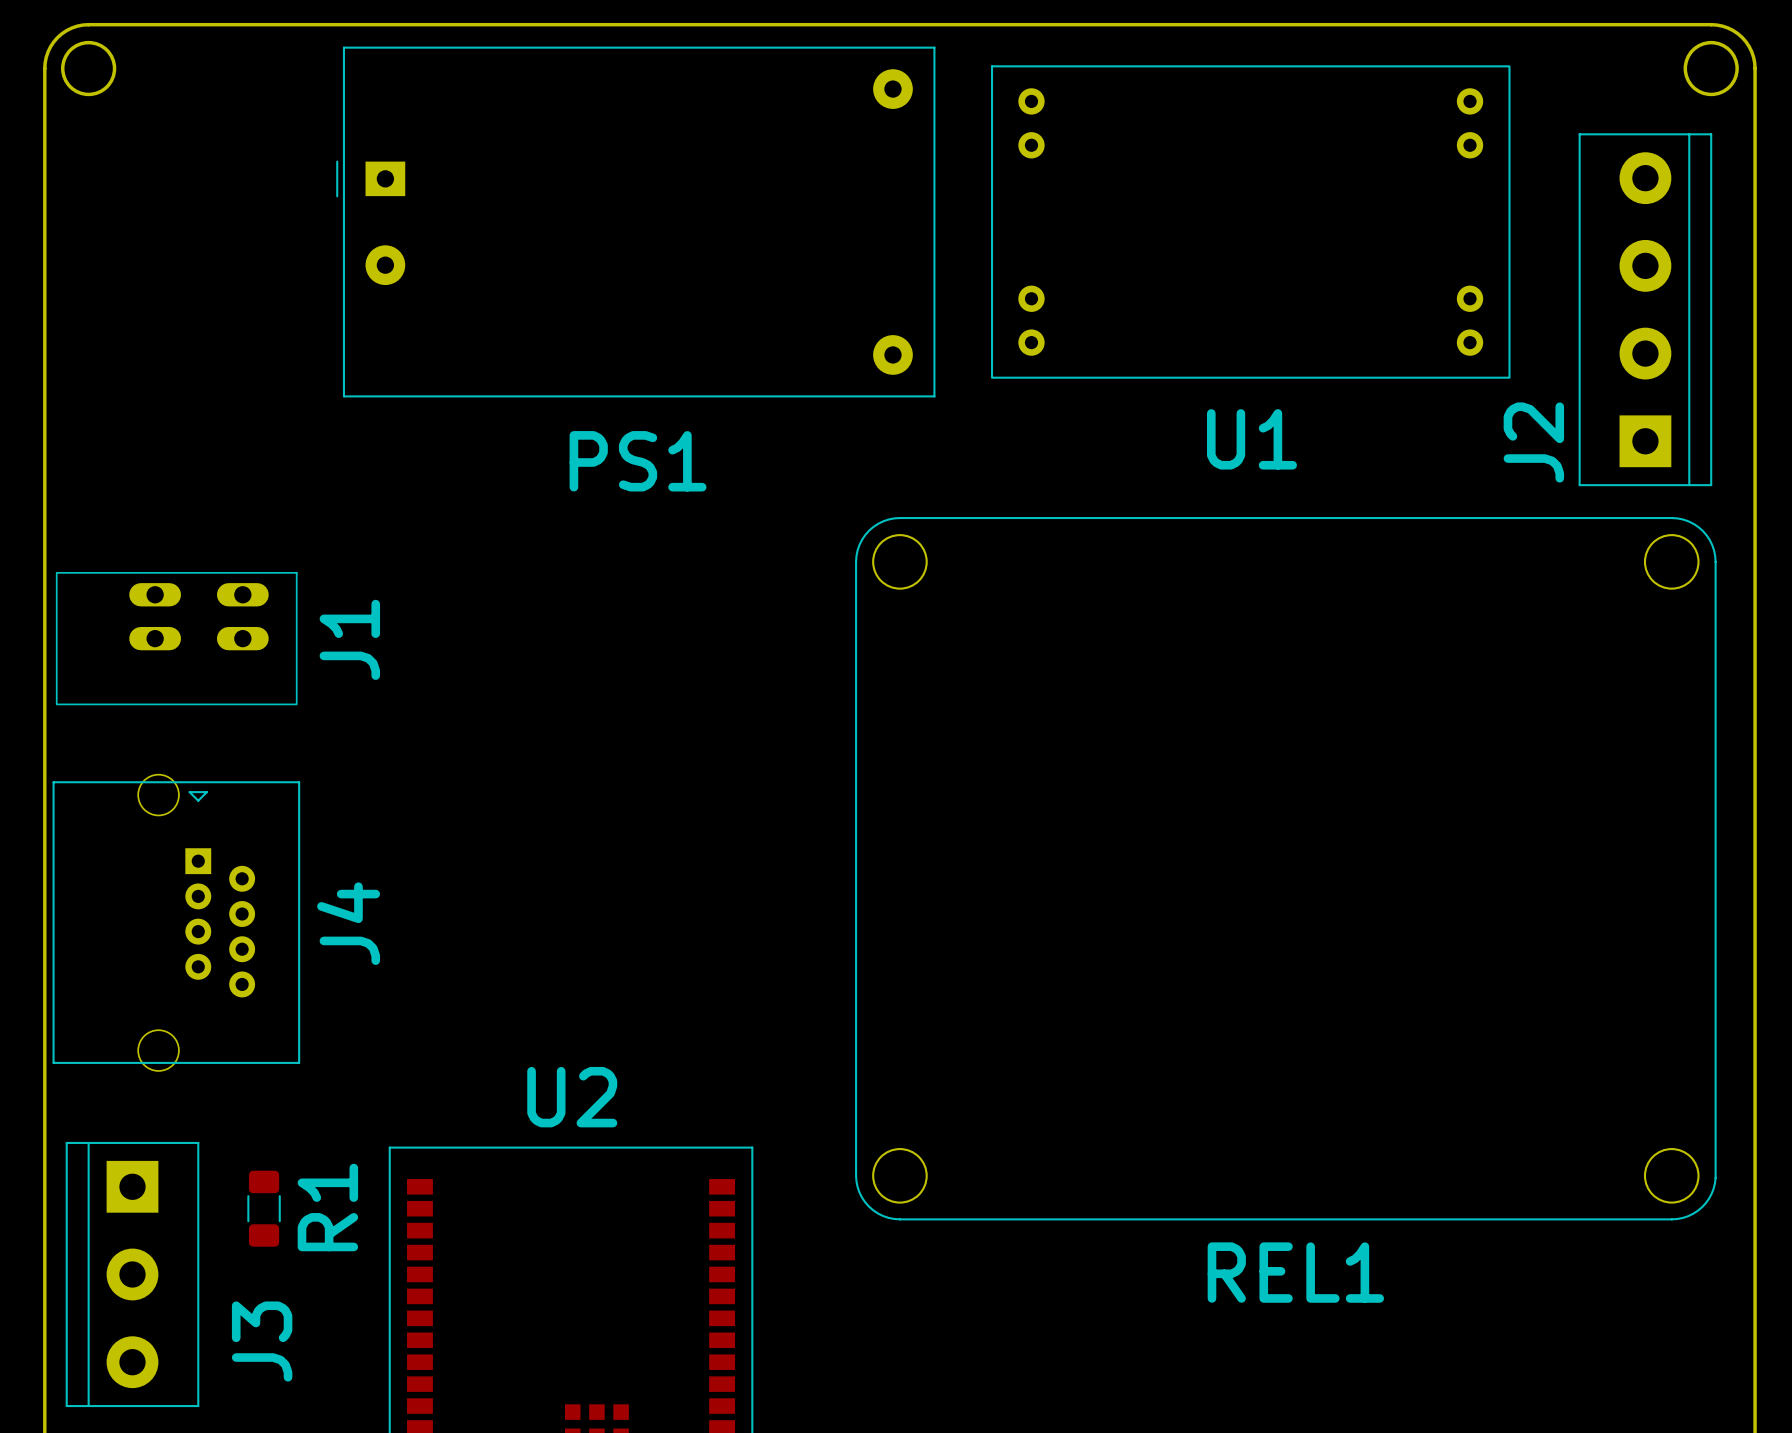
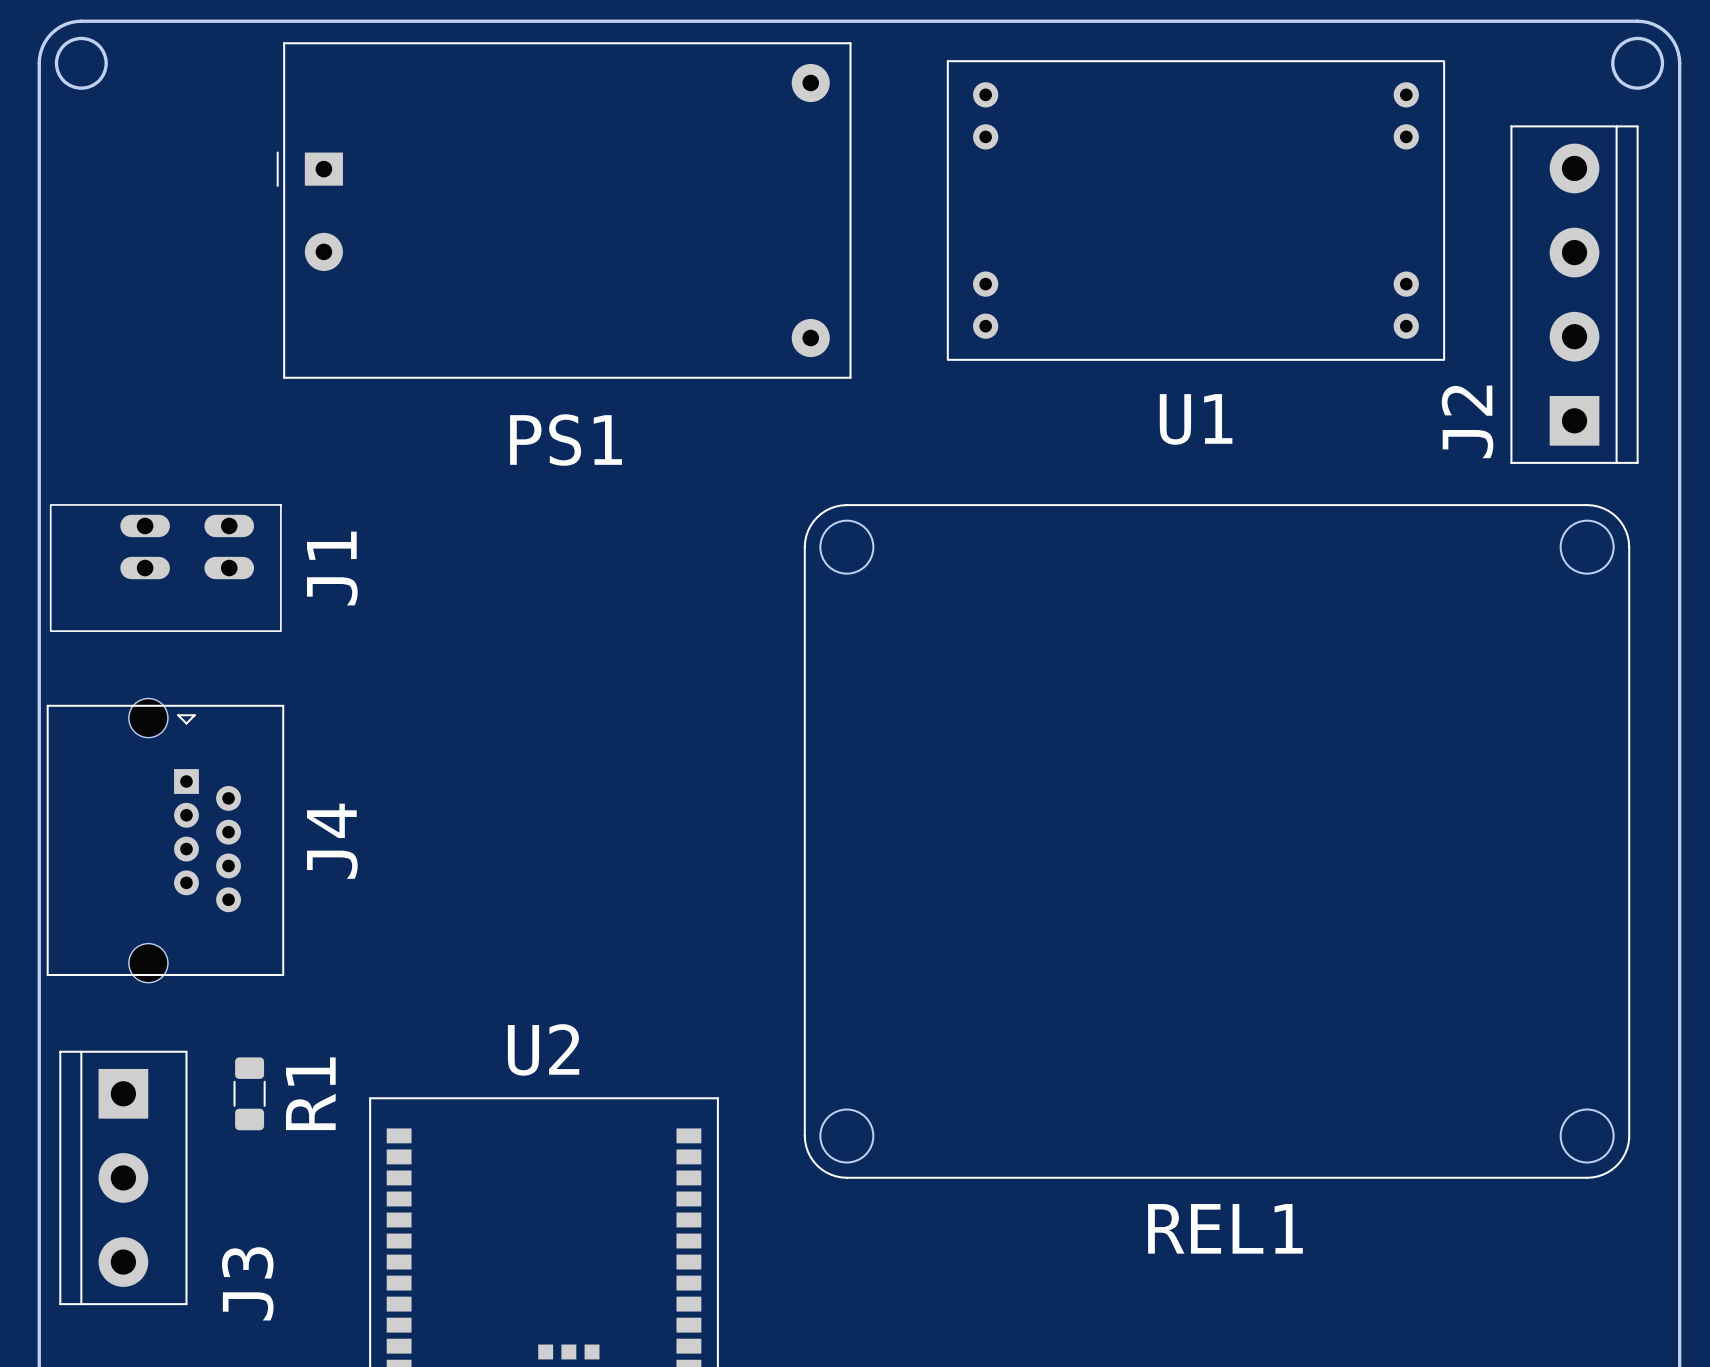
PS1 position: (635, 222) -> (564, 210)
REL1 footprint: [855, 516, 1717, 1221] -> [803, 504, 1631, 1179]
J1 position: (176, 638) -> (165, 568)
J4 position: (176, 922) -> (165, 840)
R1 position: (264, 1208) -> (249, 1093)
J3 position: (132, 1274) -> (123, 1177)

